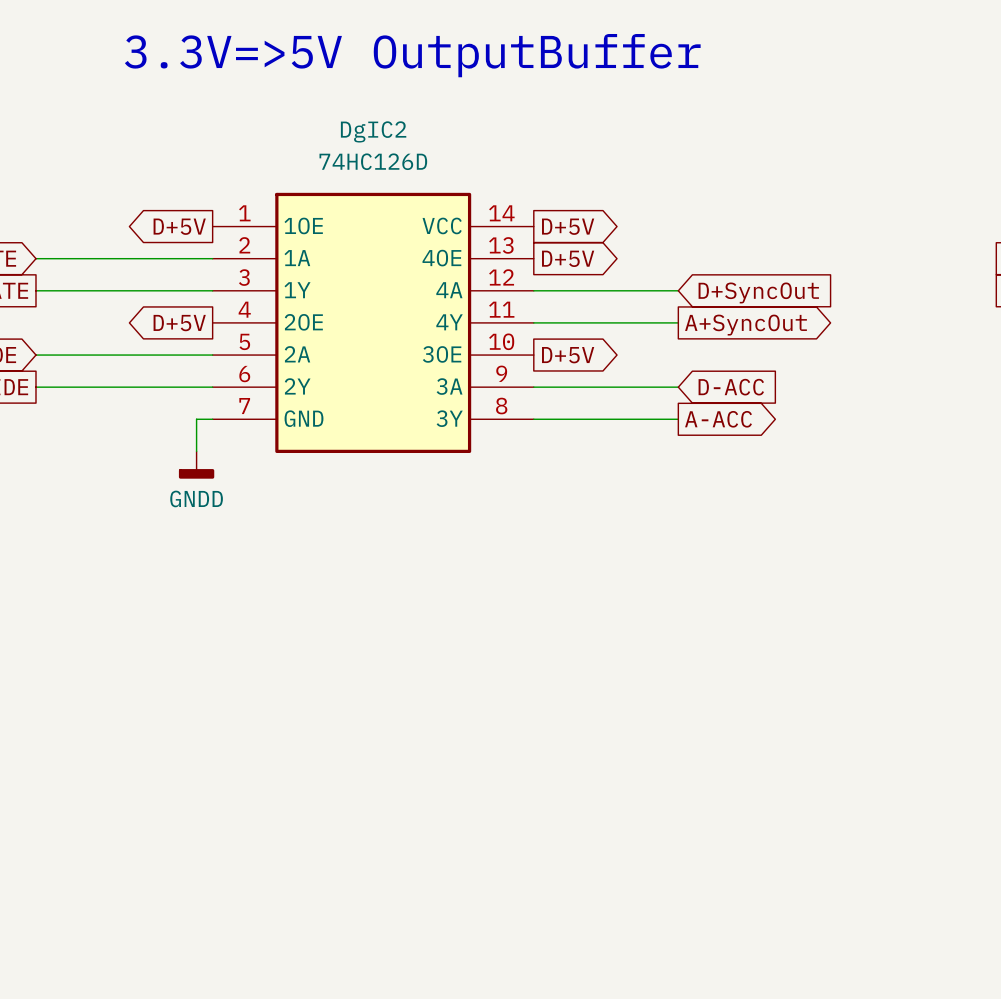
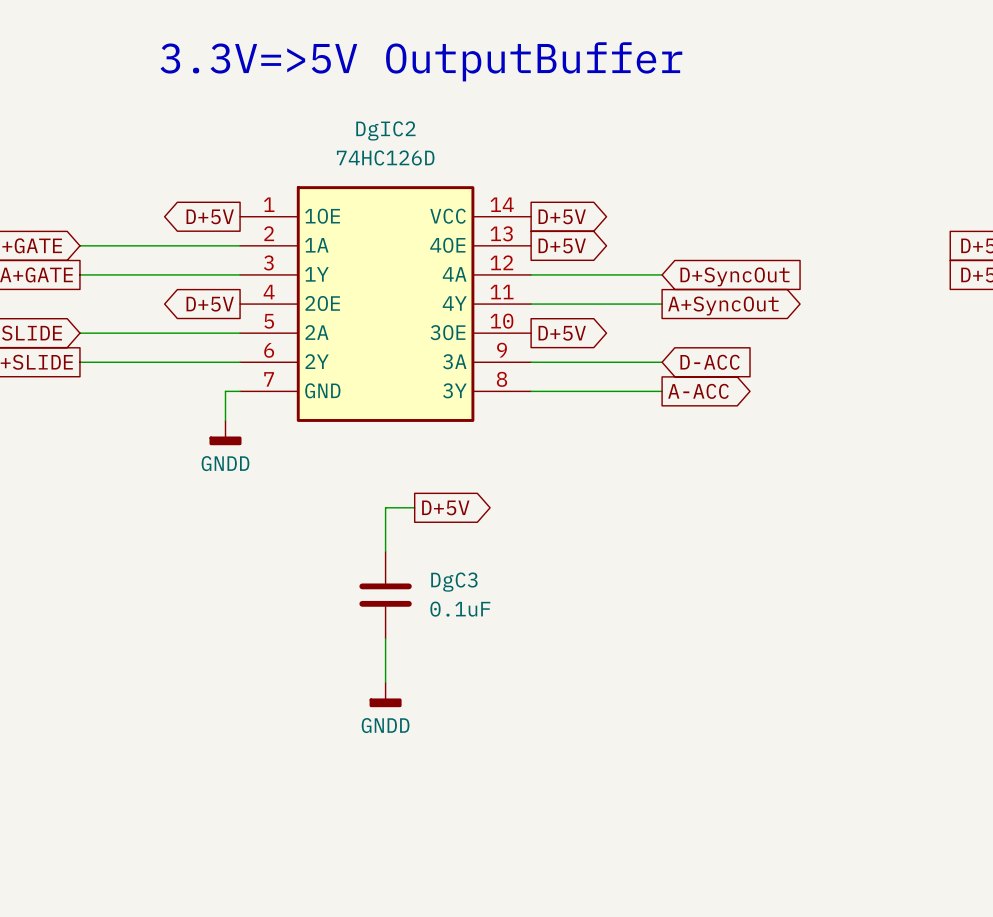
wire: none -> (414, 507) (385, 507) (385, 551)
global label: none -> D+5V (445, 507)
DgC3: none -> 0.1uF (385, 595)
wire: none -> (385, 638) (385, 682)
power symbol: none -> GNDD (385, 694)

